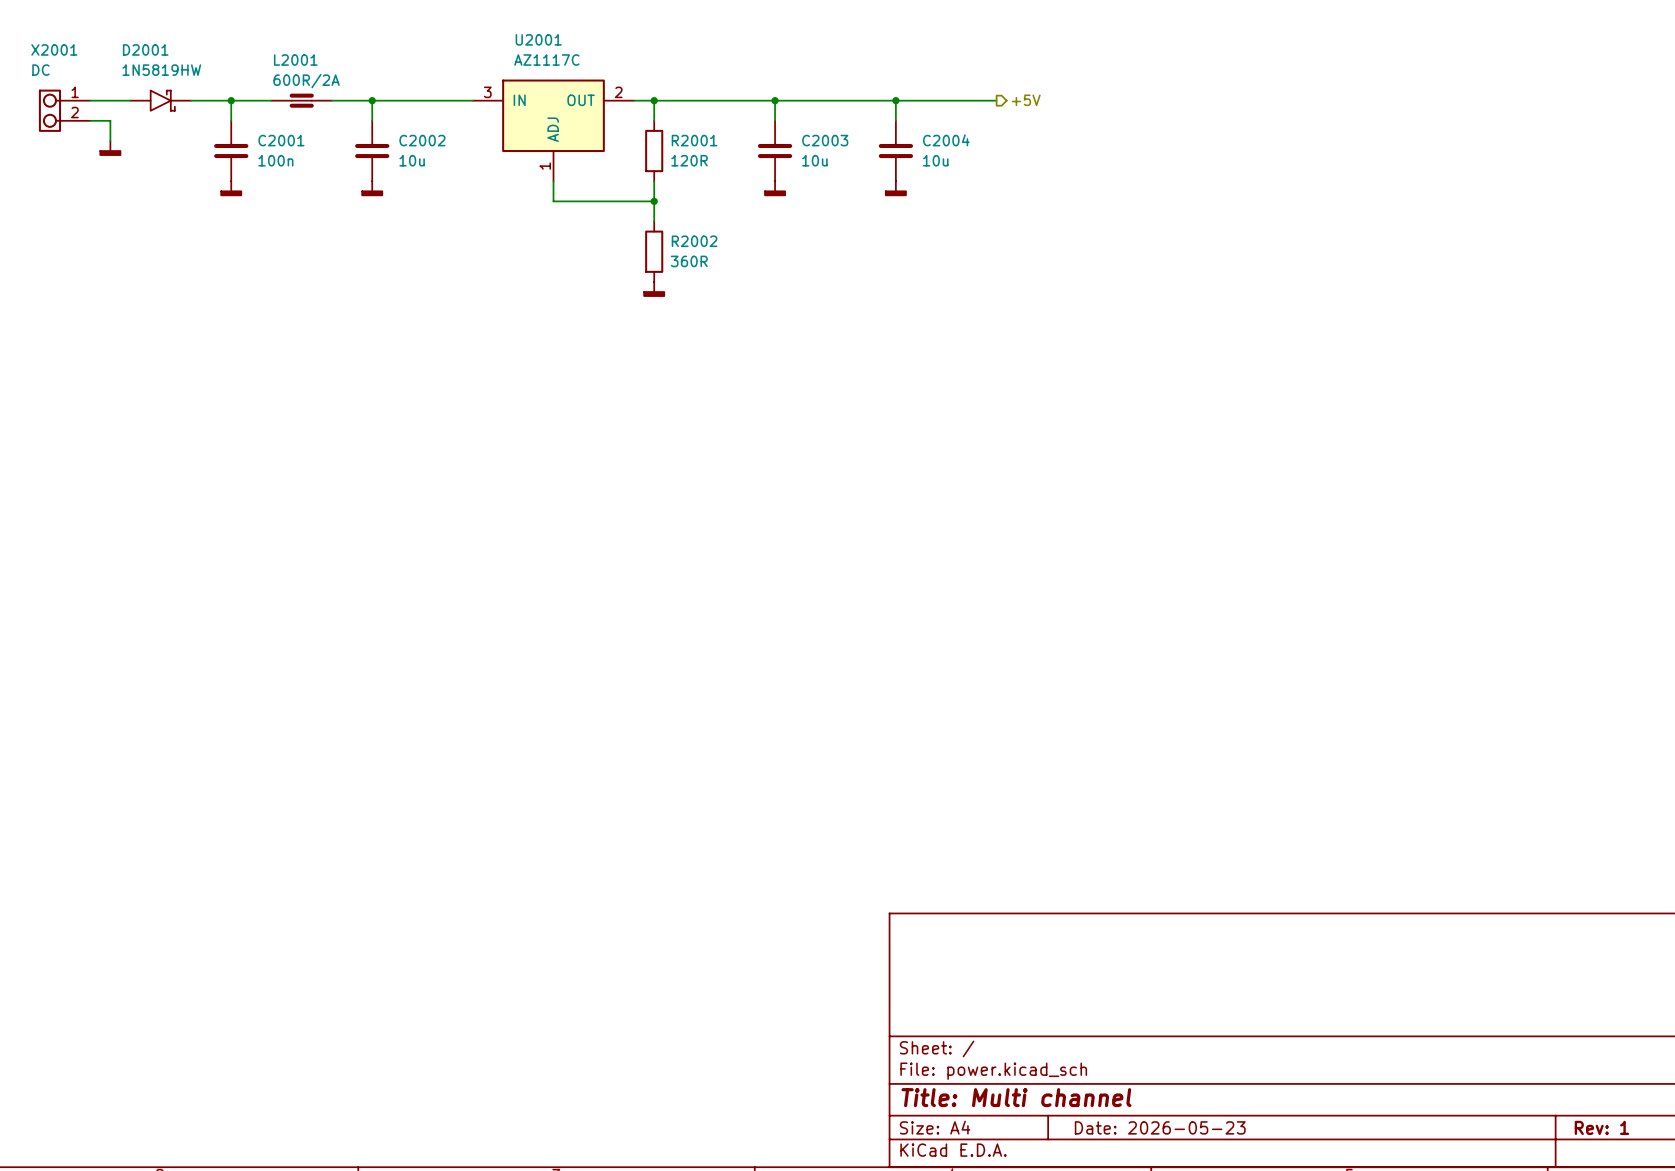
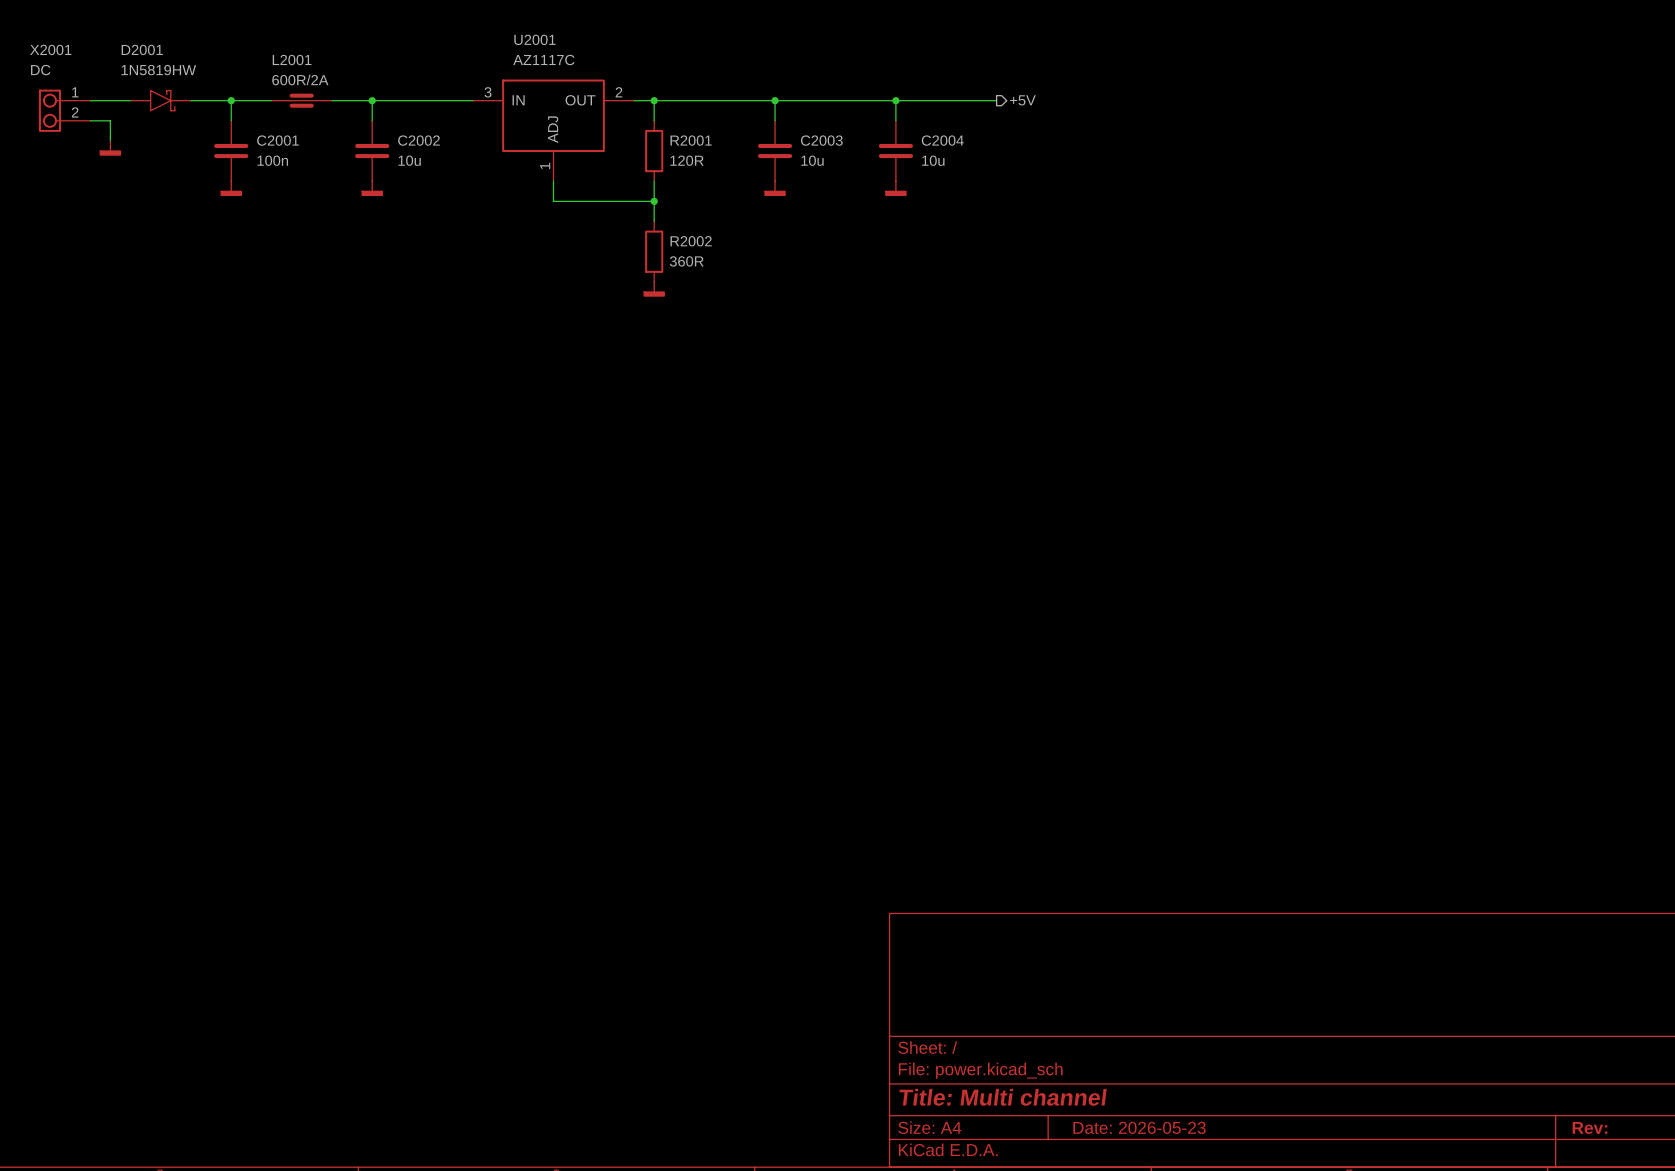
title block: Rev: 1 (1601, 1127) -> Rev: (1589, 1127)

